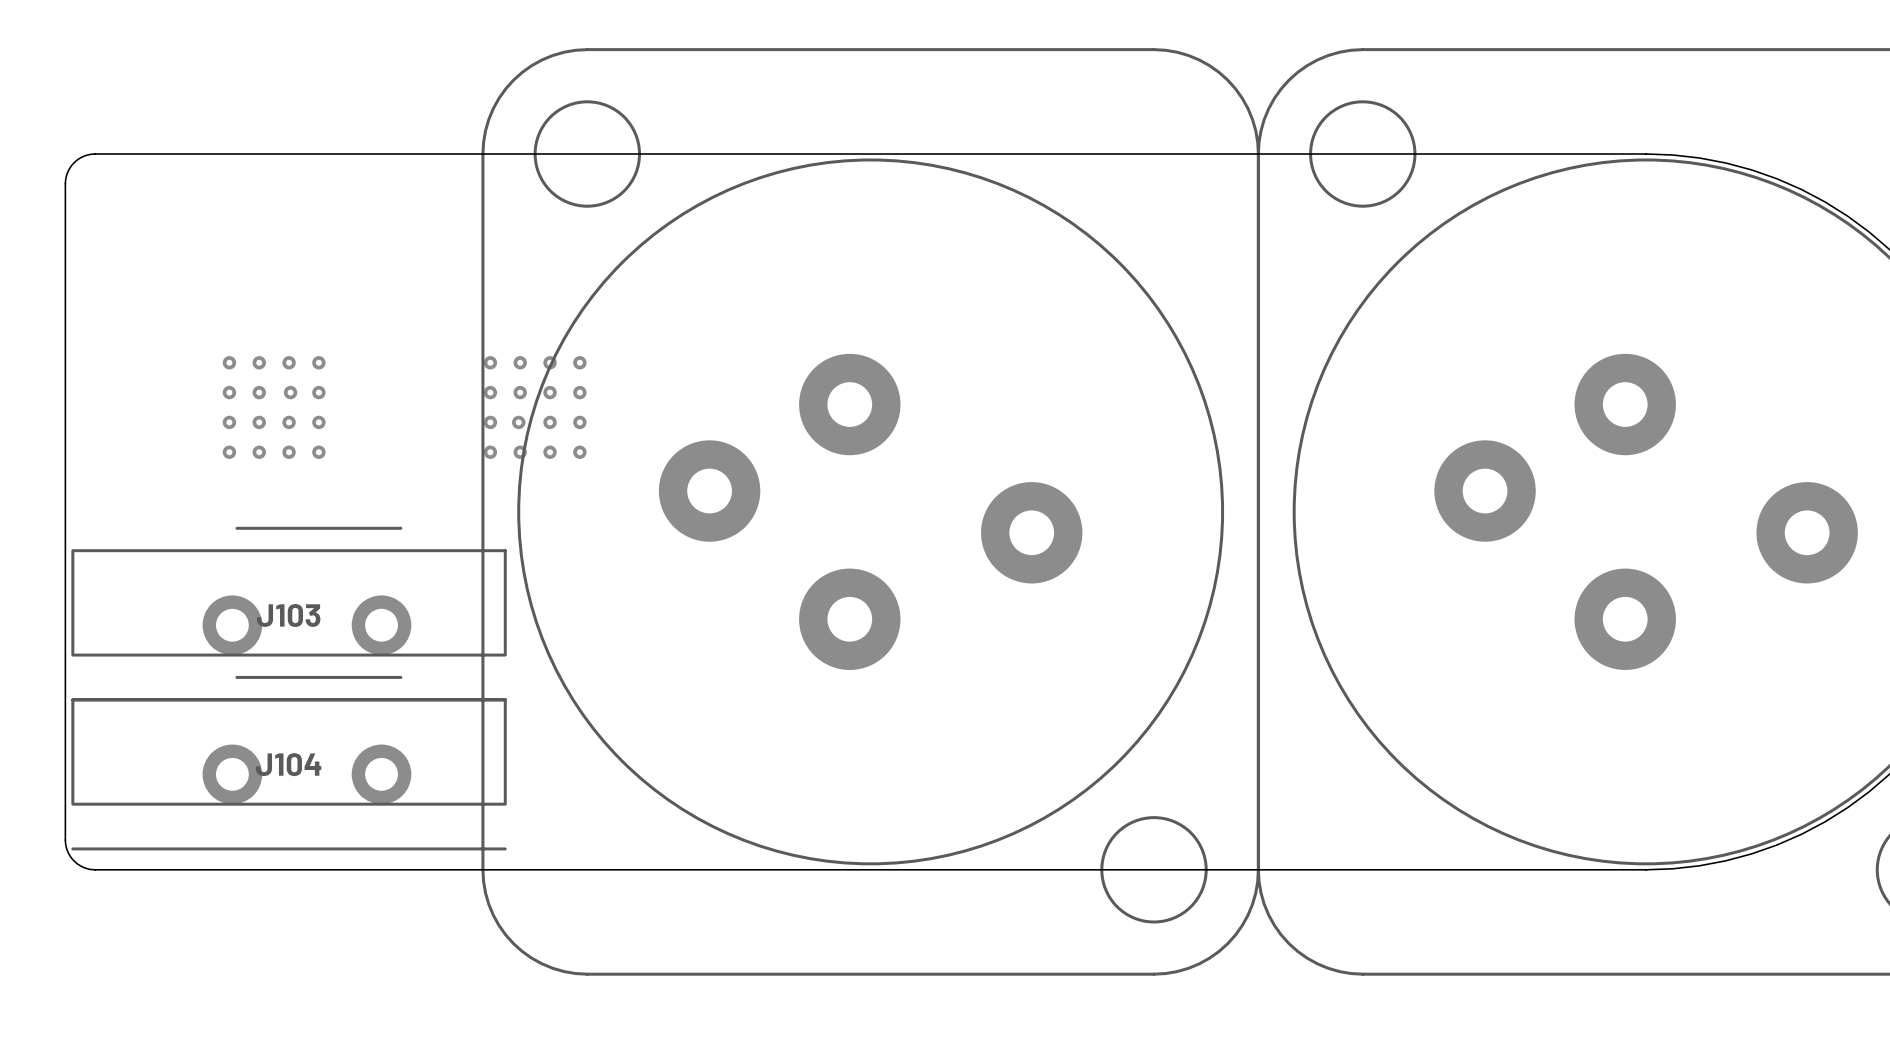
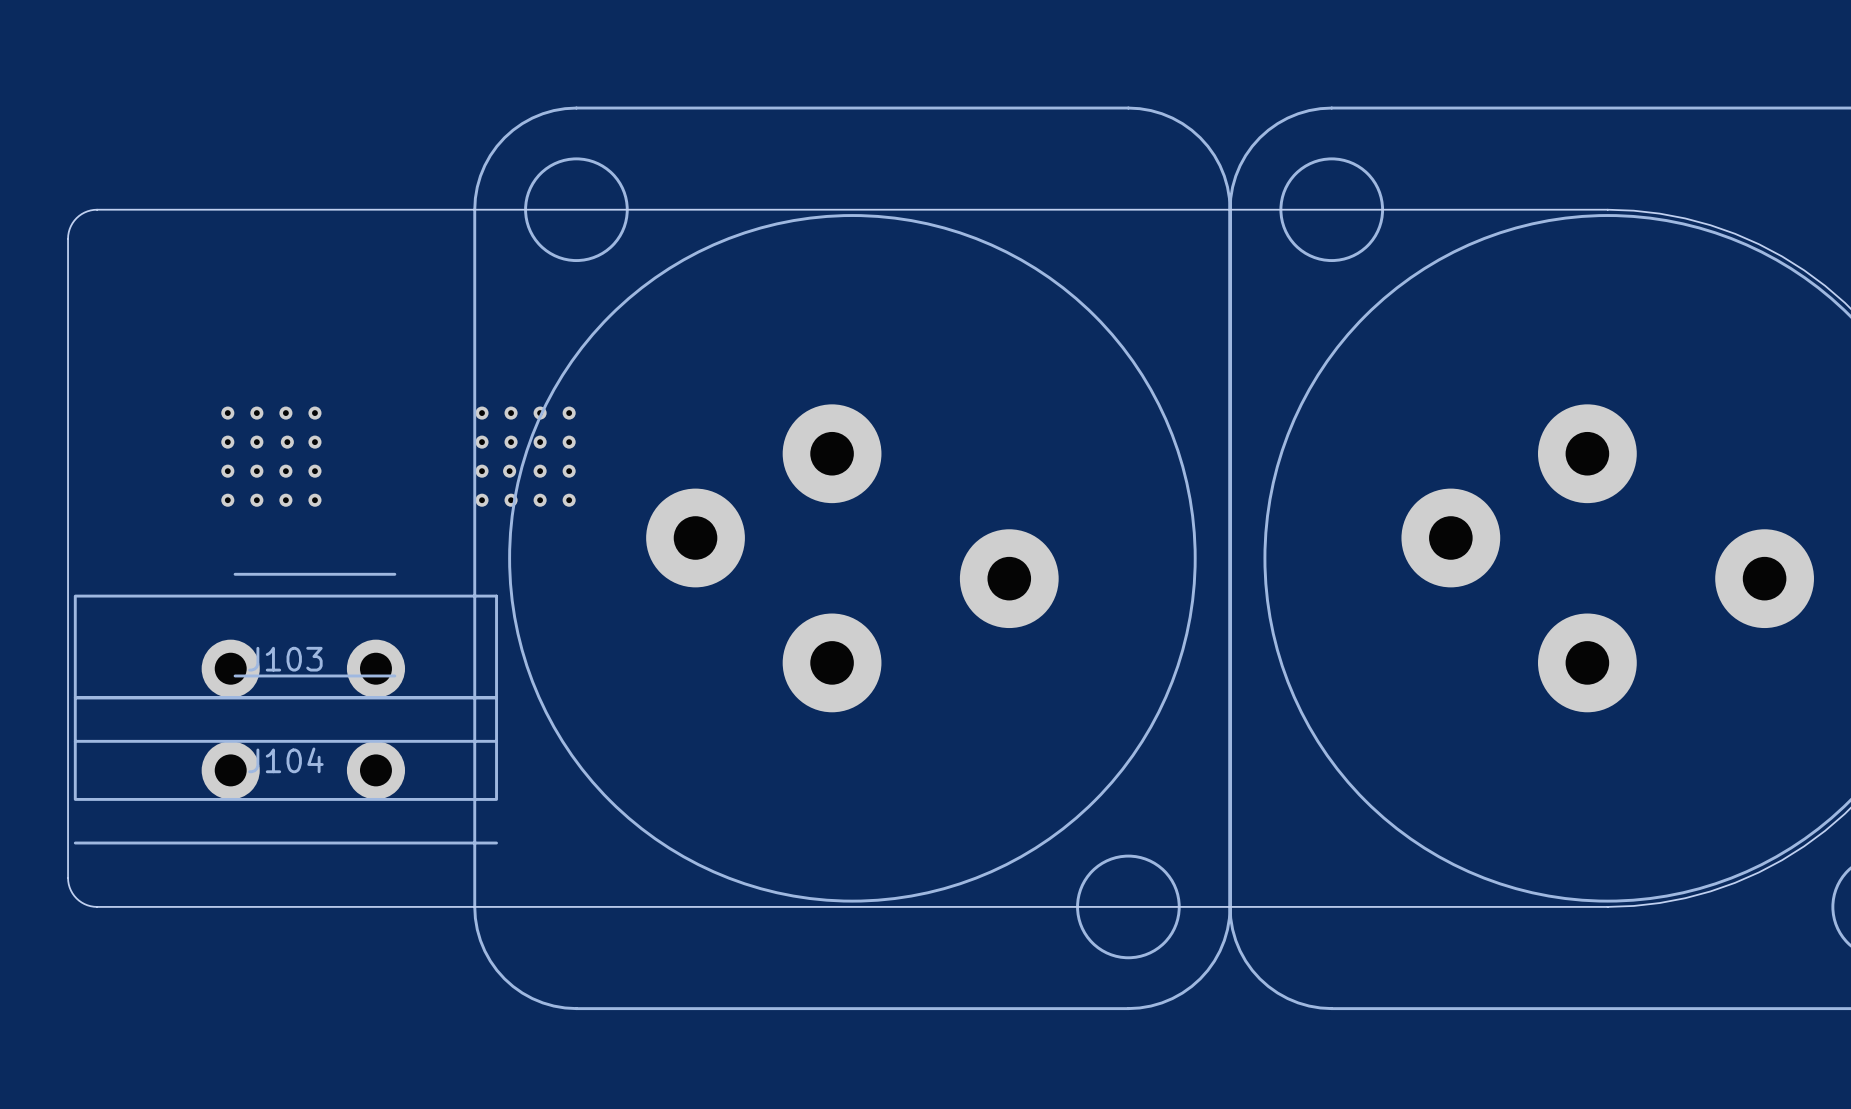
J104 position: (289, 763) -> (285, 759)

